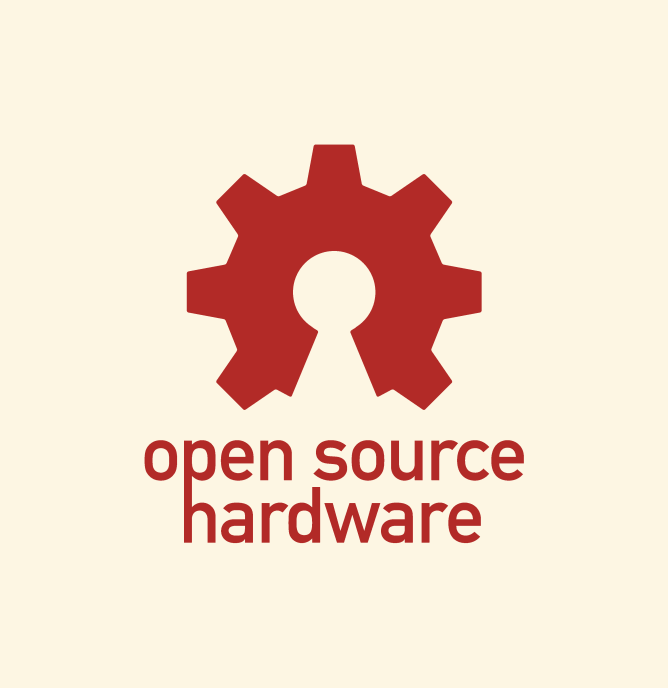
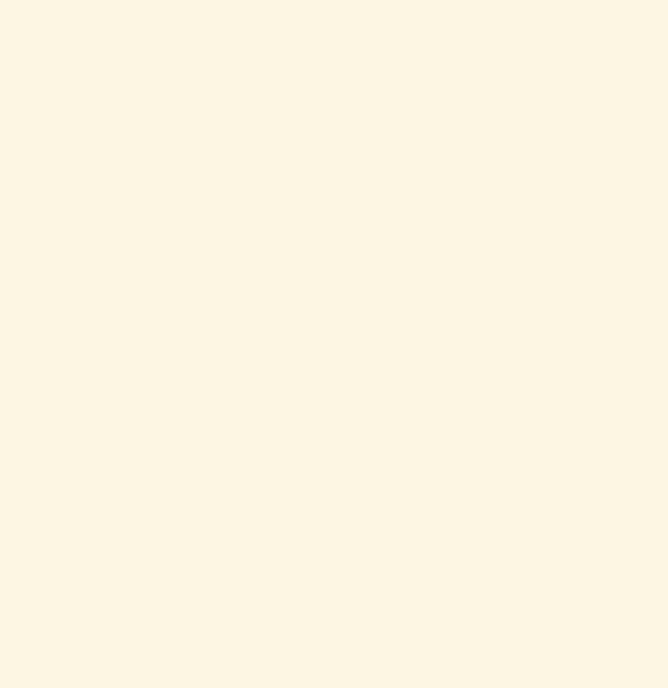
part: (334, 343) -> none

